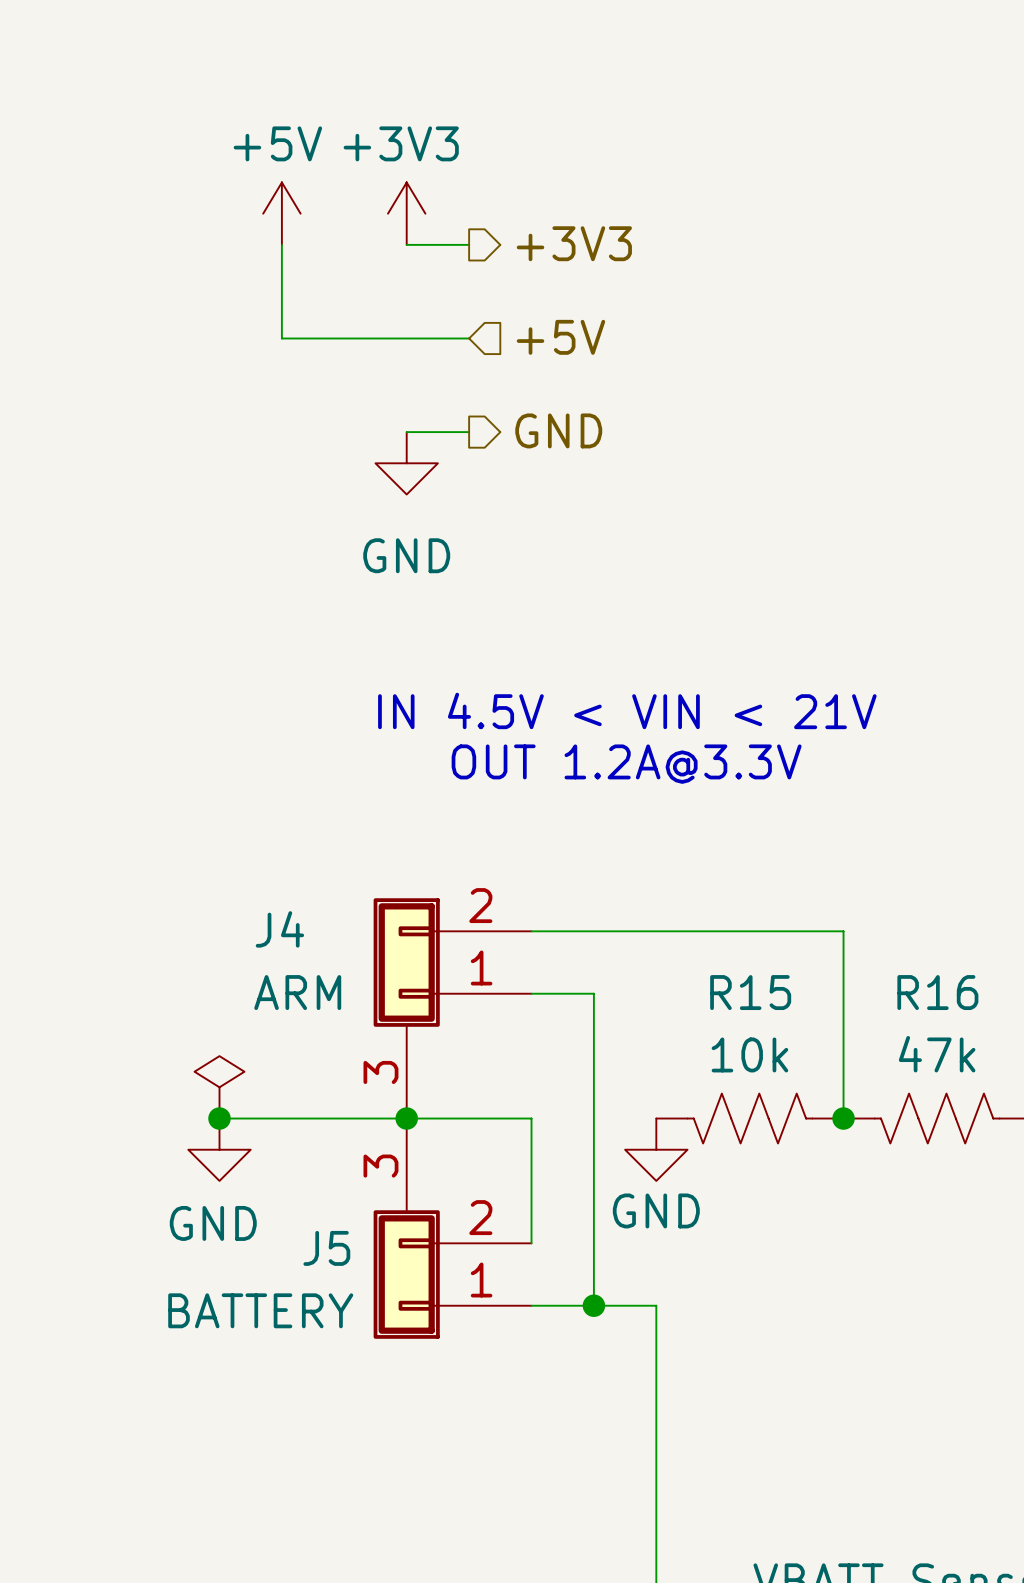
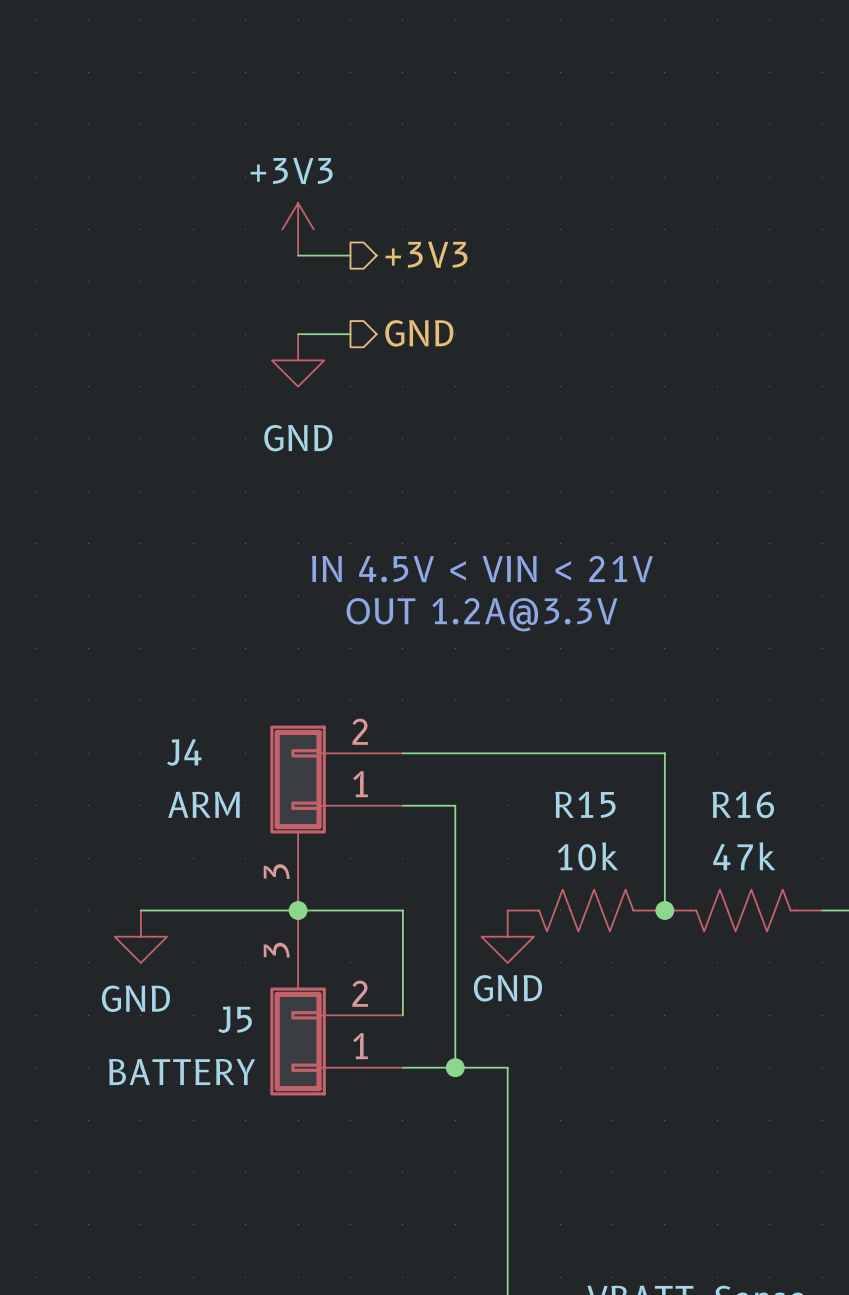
power symbol: +5V (281, 213) -> none
power symbol position: +3V3 (406, 213) -> +3V3 (298, 229)
hierarchical label: +3V3 (574, 243) -> none
wire: (281, 244) (281, 338) (406, 338) -> none
wire: (406, 244) (469, 244) -> none
hierarchical label shape: input (560, 337) -> output (426, 254)
hierarchical label: +5V (560, 337) -> +3V3 (426, 254)
power symbol: (219, 1087) -> none
junction: (219, 1118) -> none

